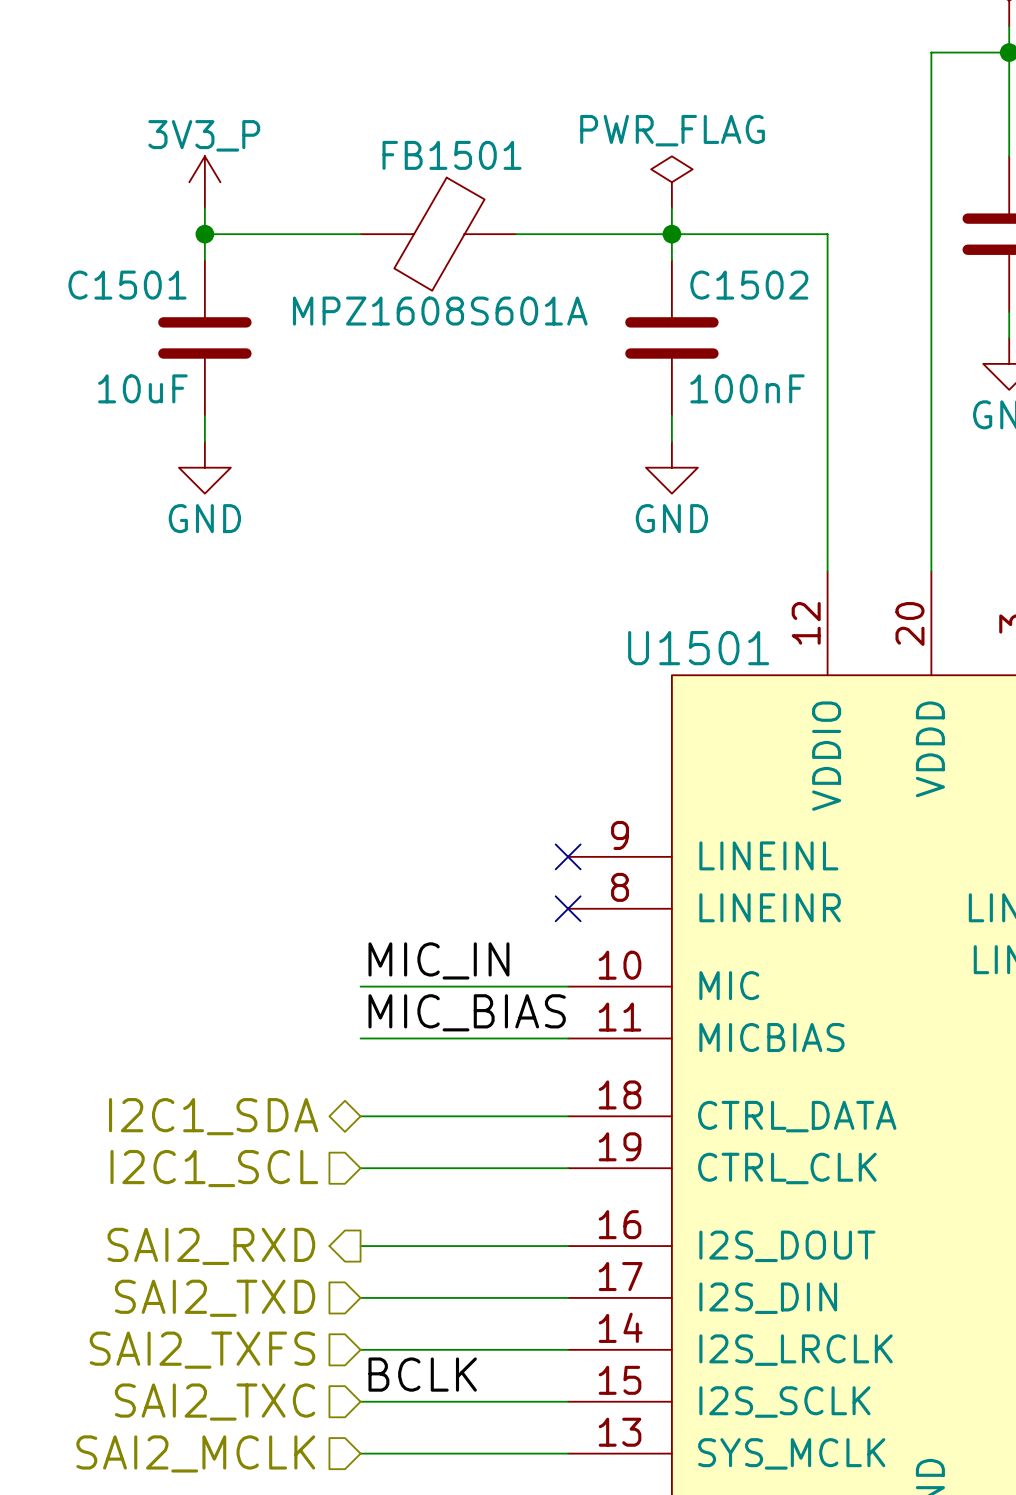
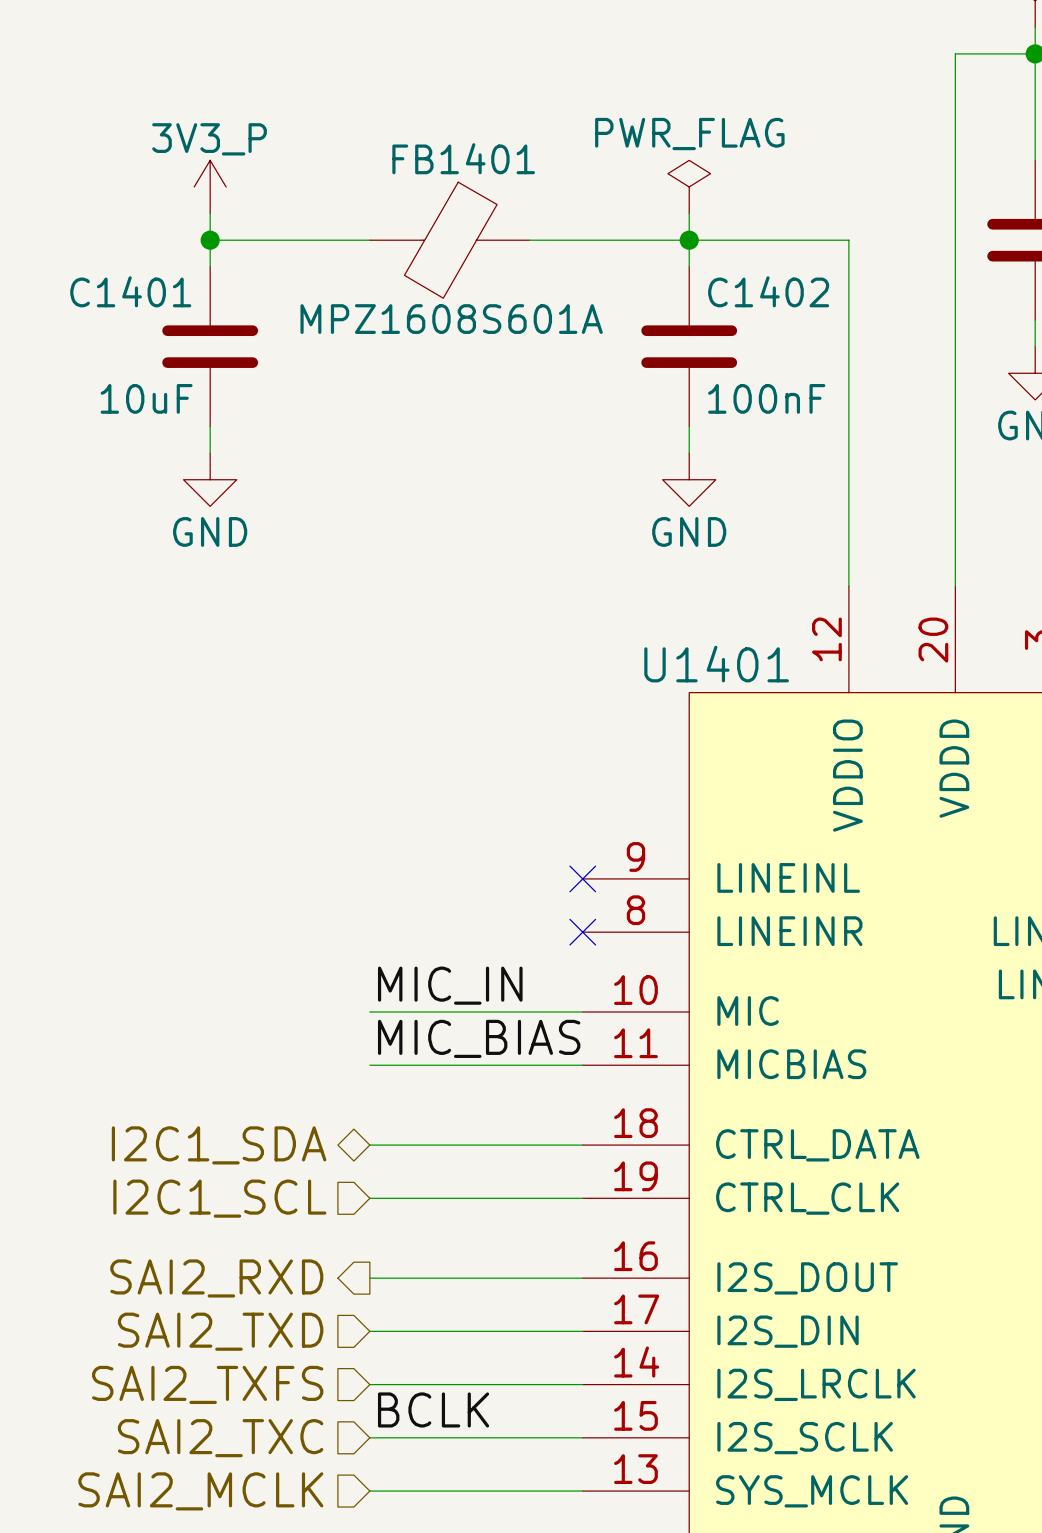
FB1501 name: FB1501 (451, 155) -> FB1401 (463, 158)
C1501 name: C1501 (127, 285) -> C1401 (130, 291)
C1502 name: C1502 (749, 285) -> C1402 (768, 291)
U1501 name: U1501 (698, 648) -> U1401 (716, 664)

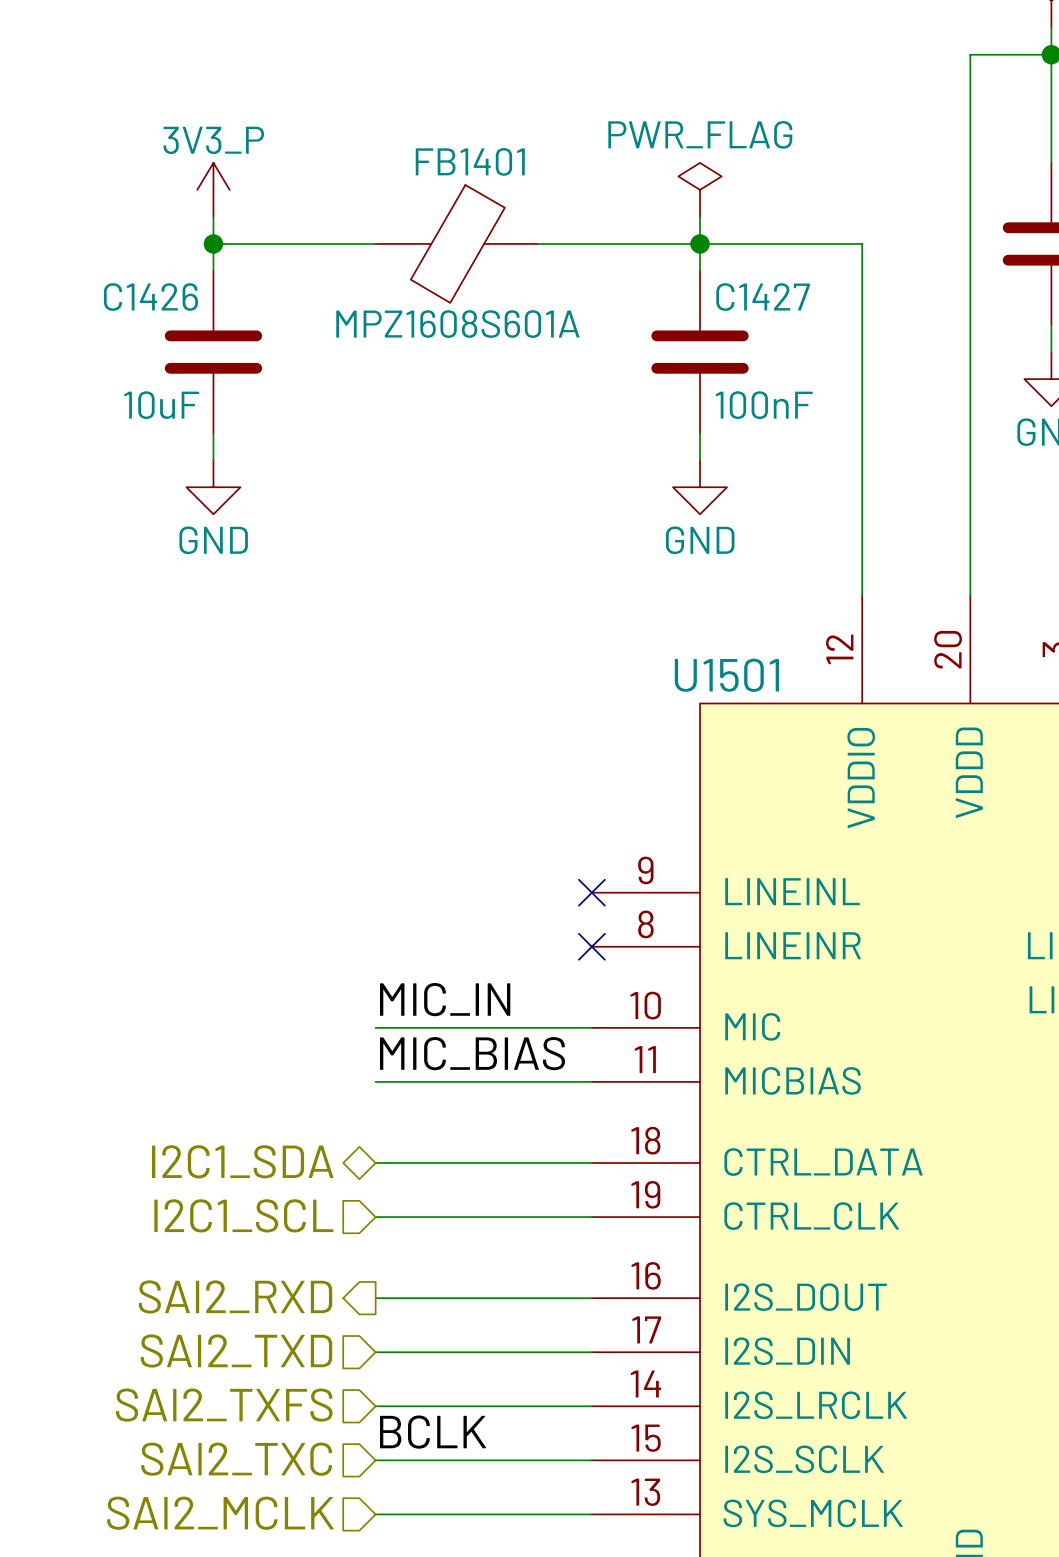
C1401 name: C1401 (130, 291) -> C1426 (150, 297)
C1402 name: C1402 (768, 291) -> C1427 (763, 297)
U1401 name: U1401 (716, 664) -> U1501 (726, 675)

